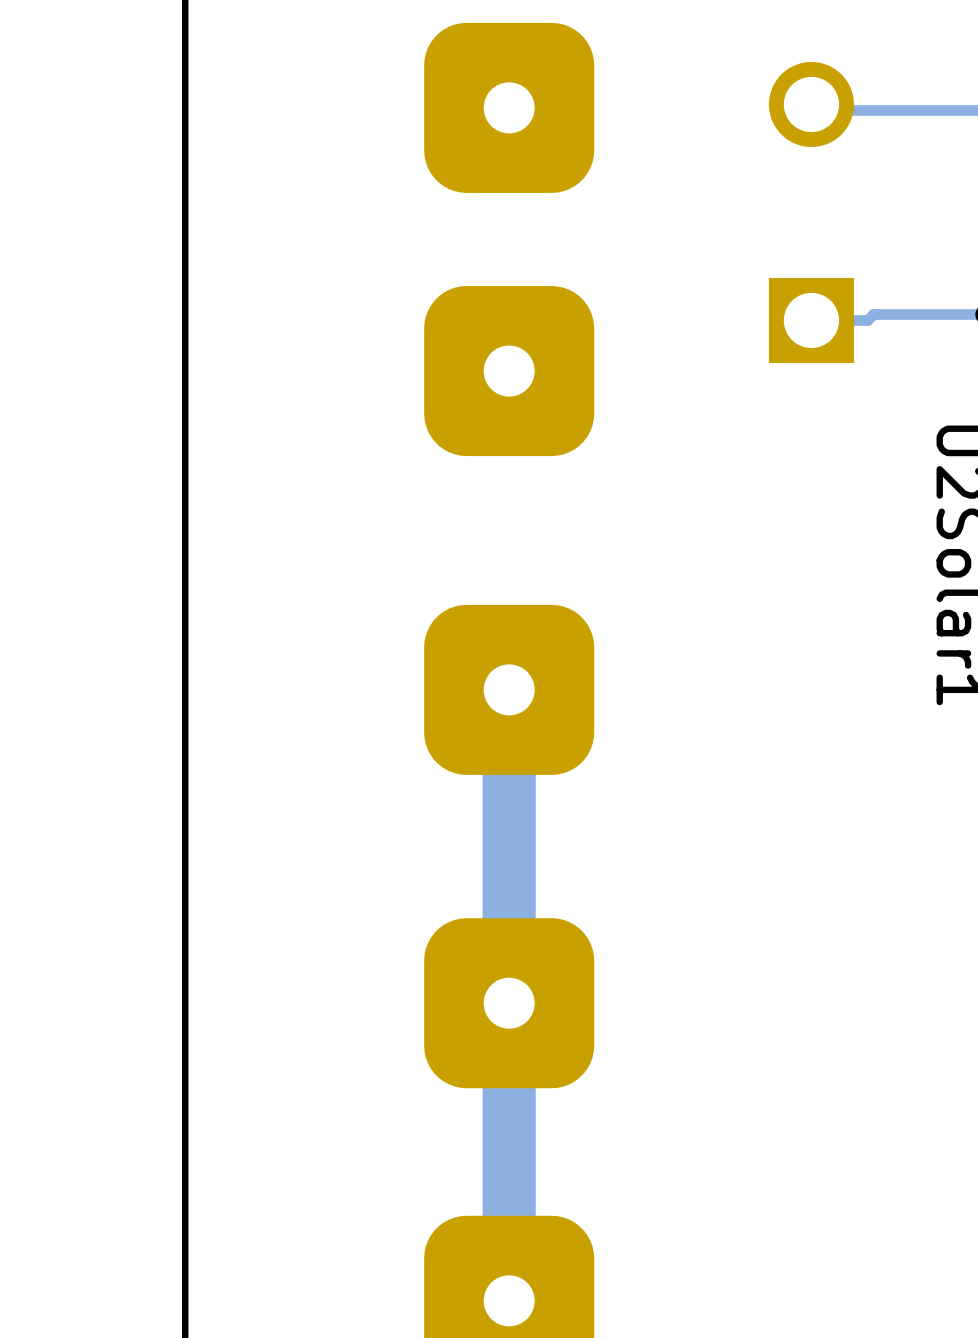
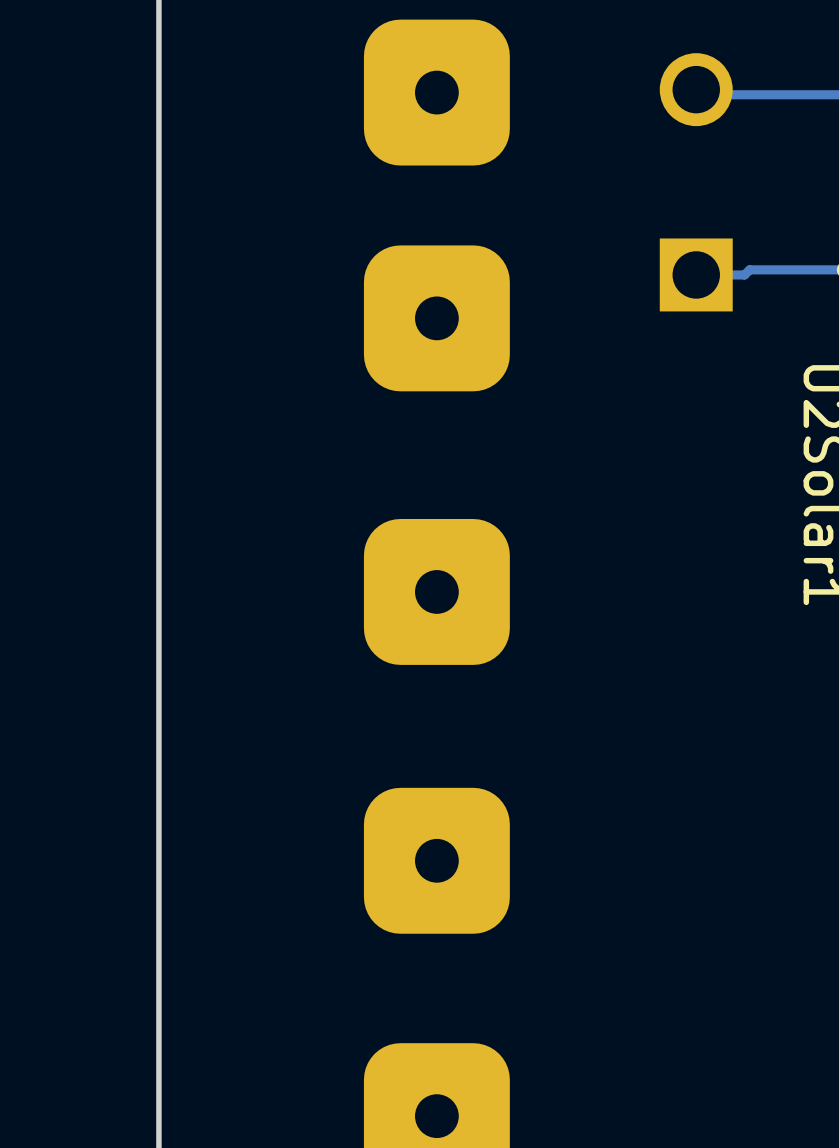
track: (509, 689) (509, 1300) -> none

